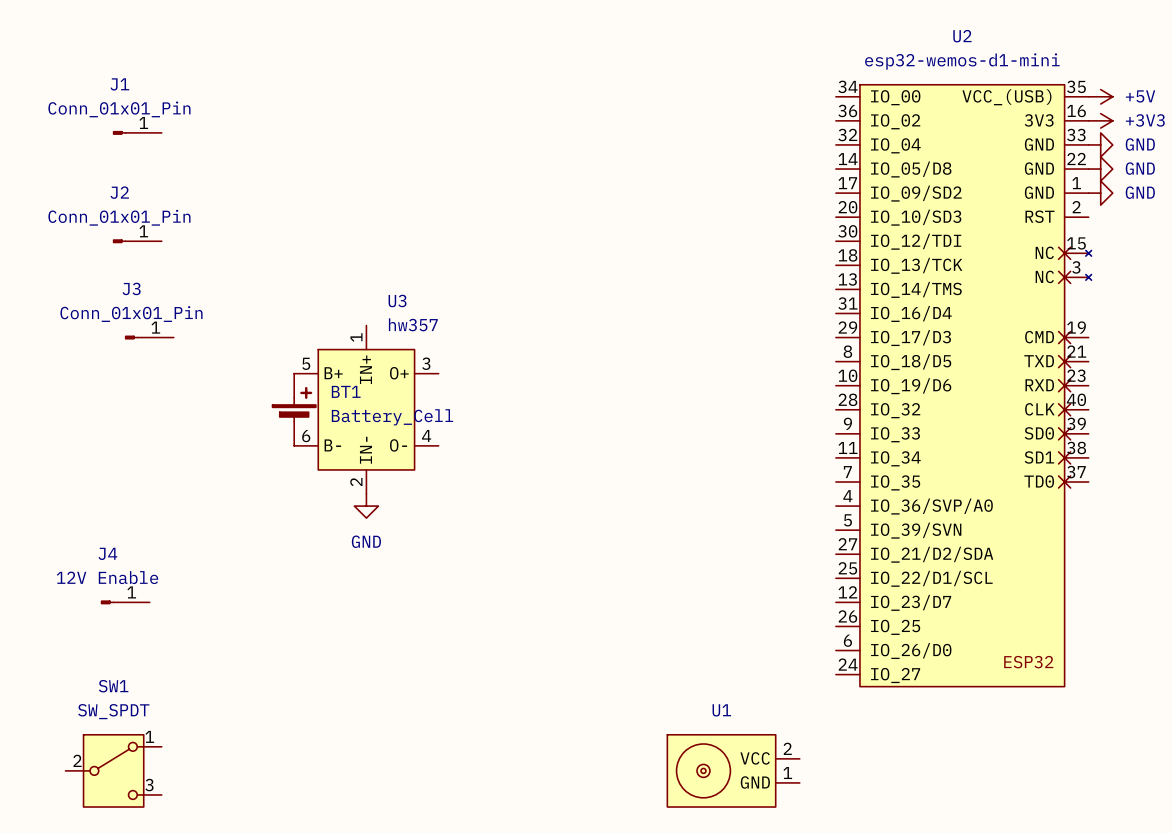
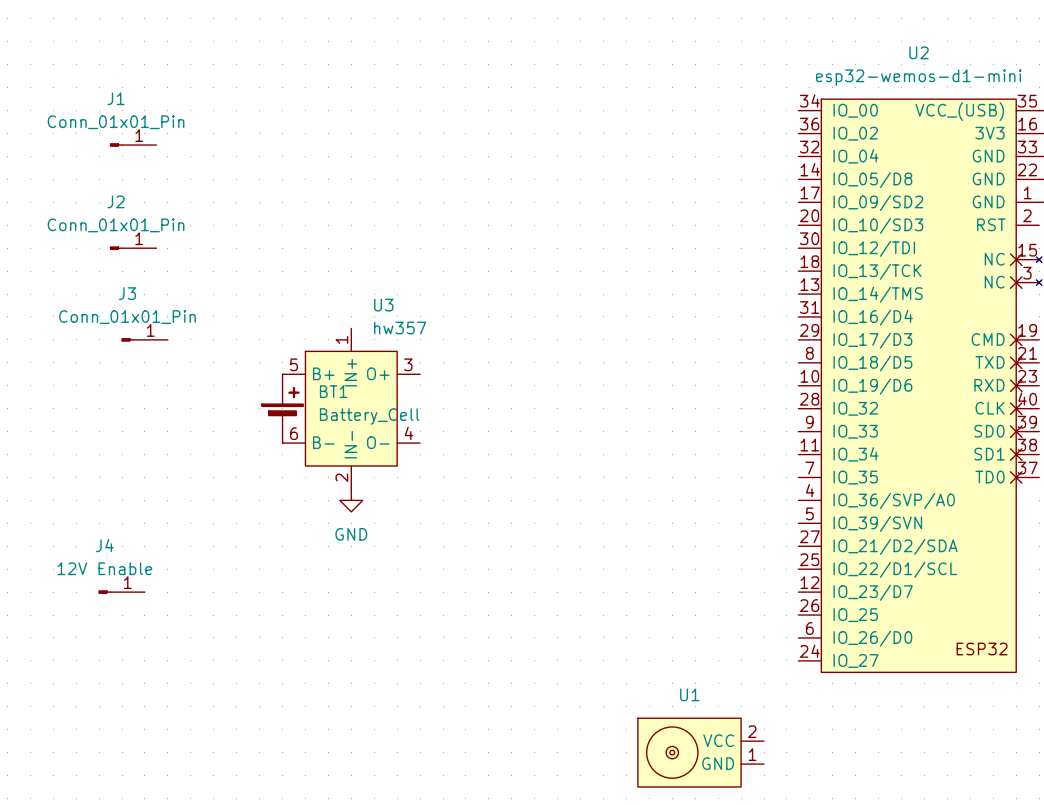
SW1: SW_SPDT (113, 770) -> none

